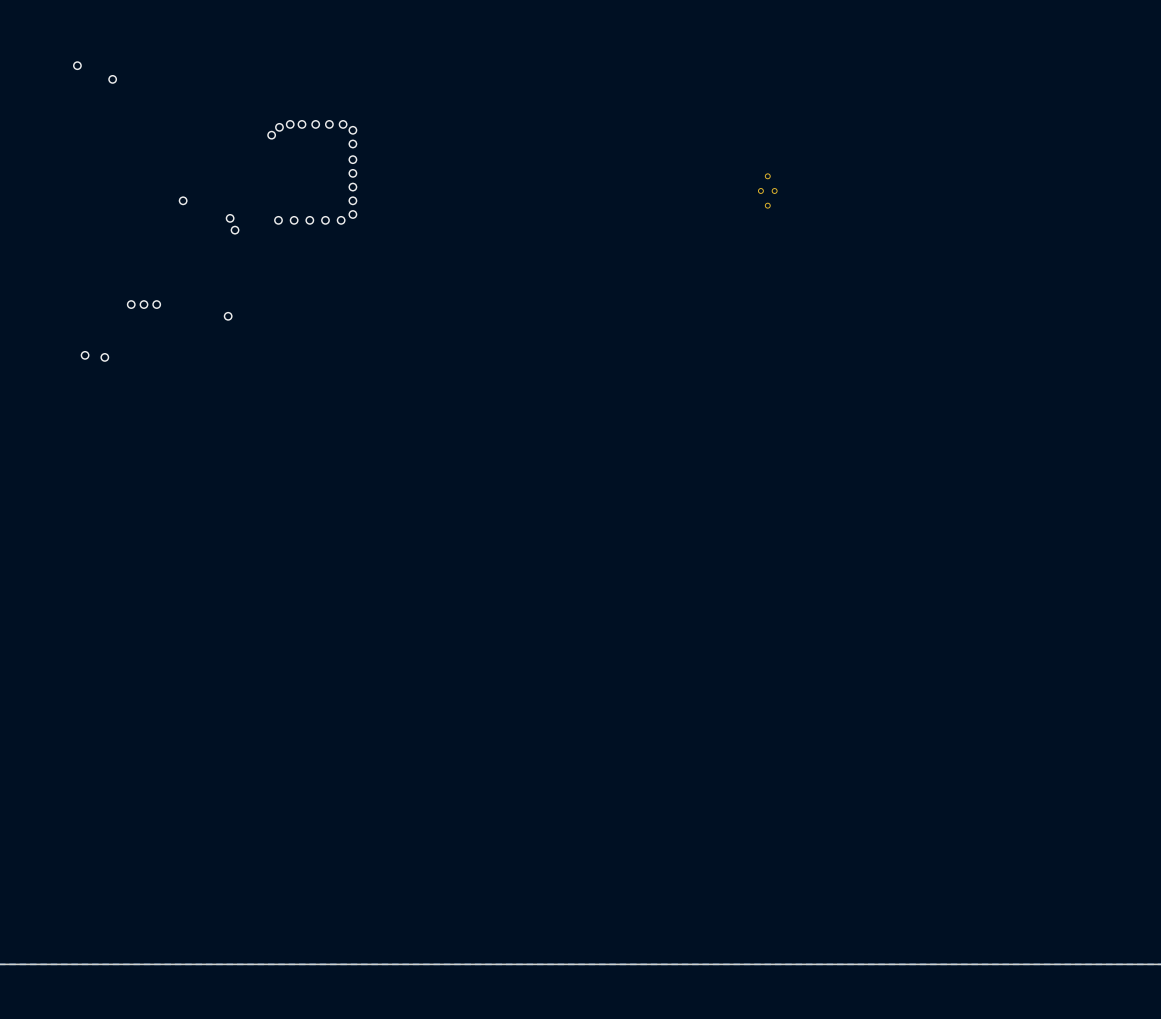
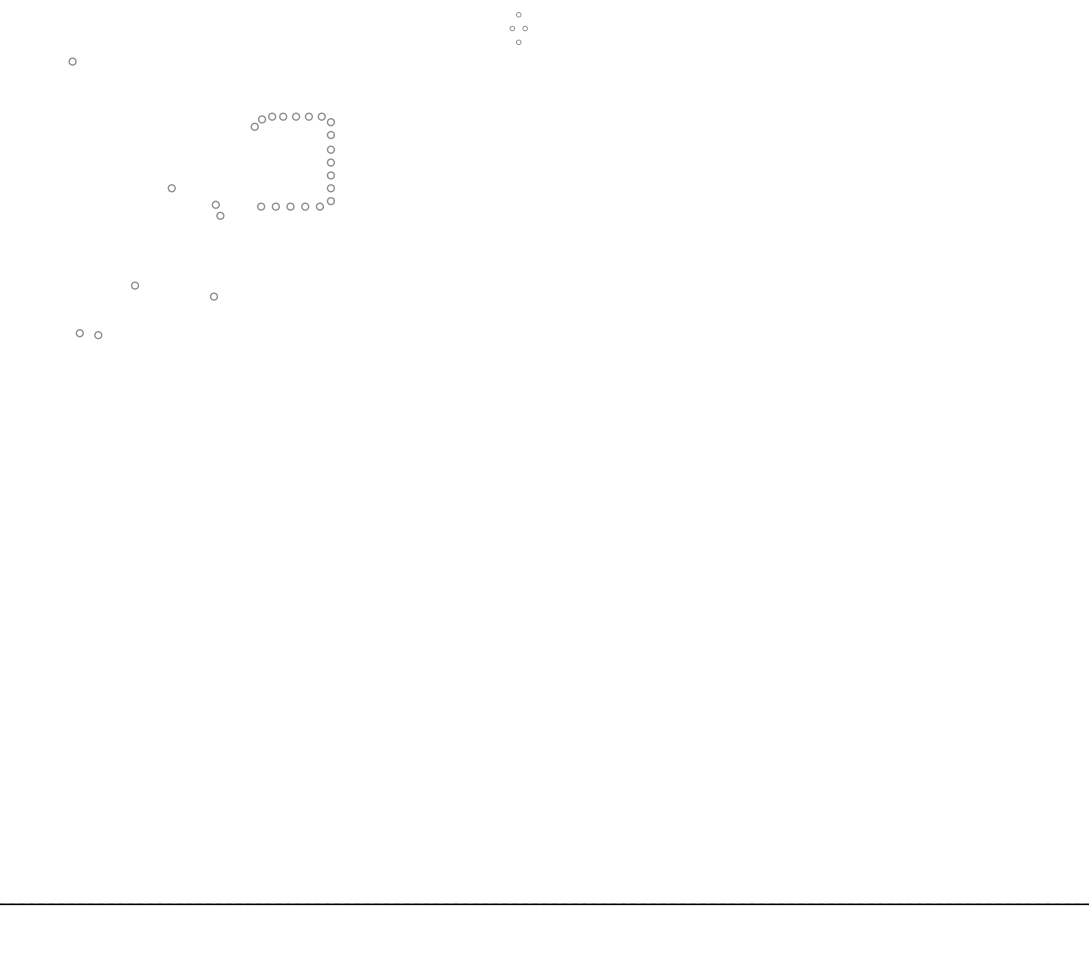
via: (112, 79) -> none
part position: (767, 190) -> (518, 28)
via: (131, 304) -> none
via: (156, 304) -> none

